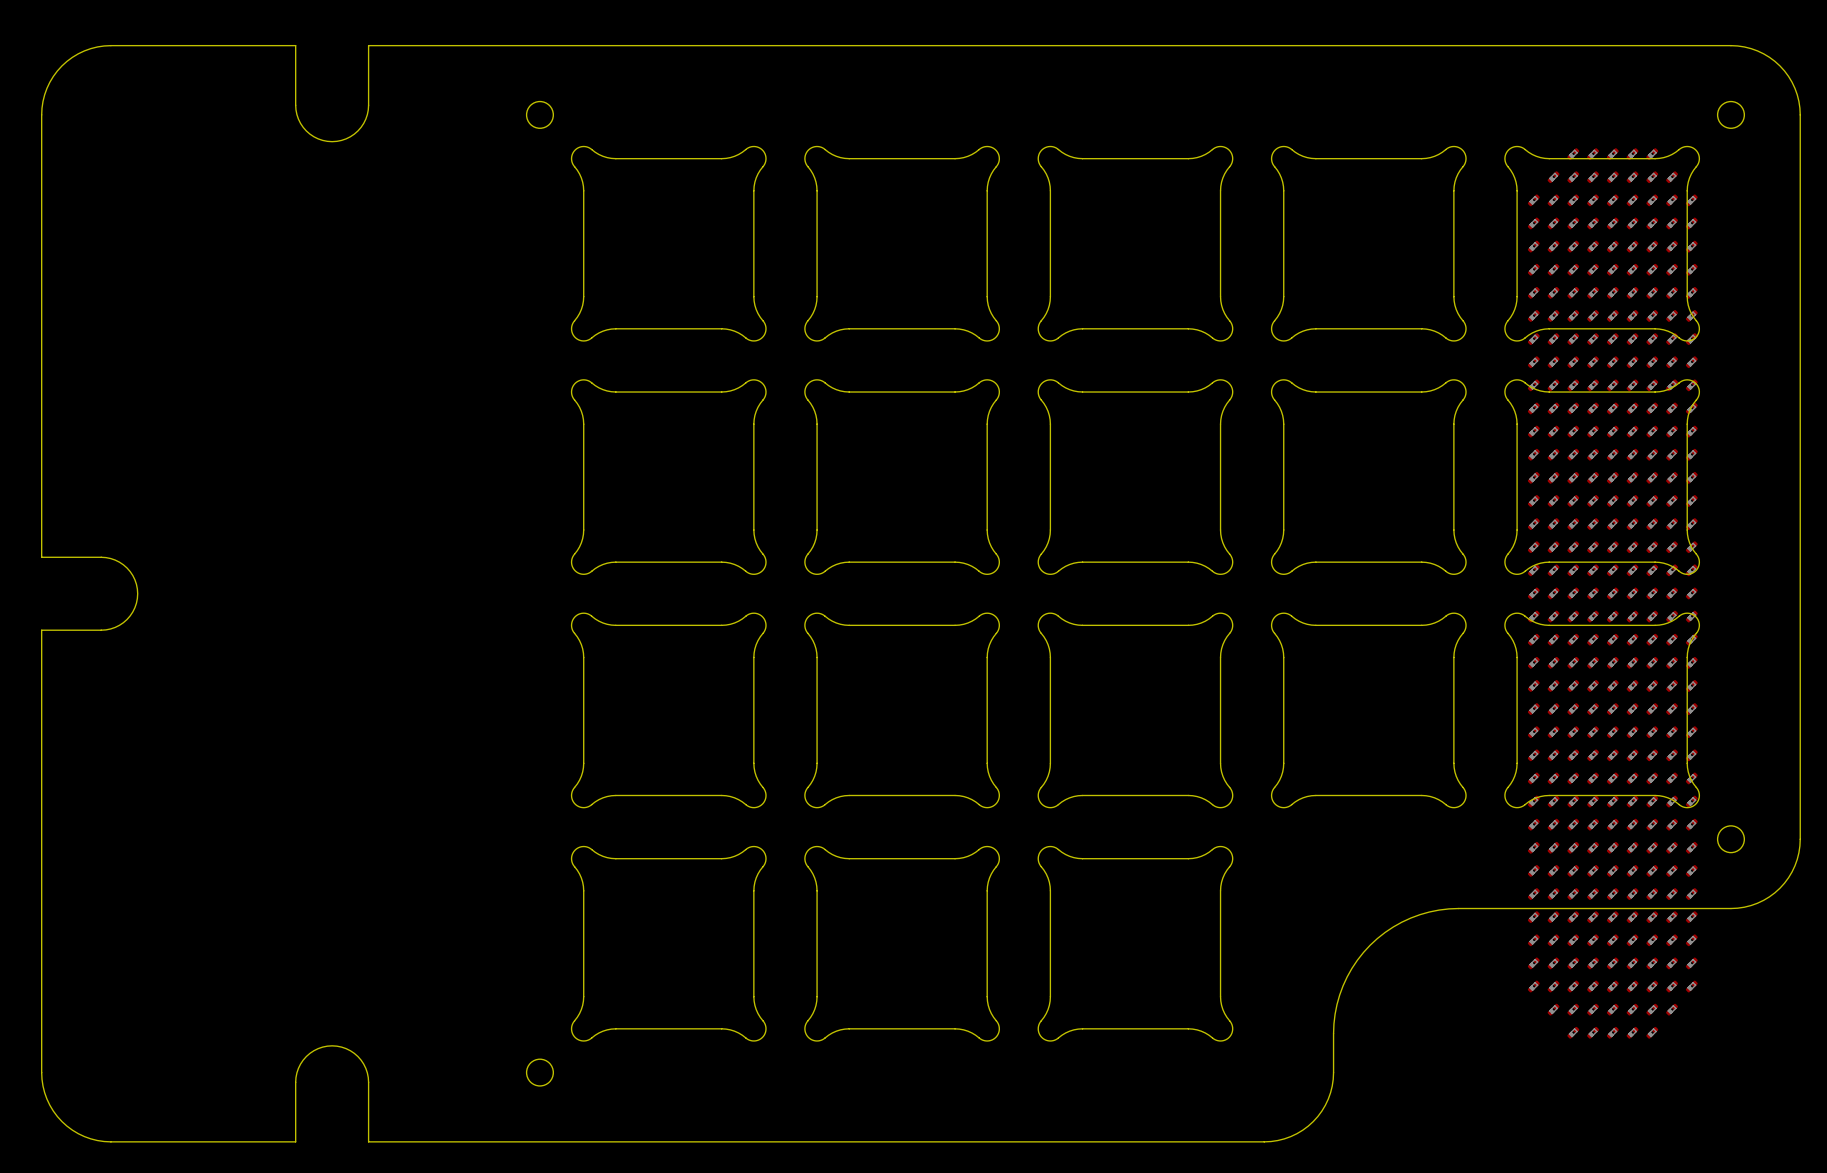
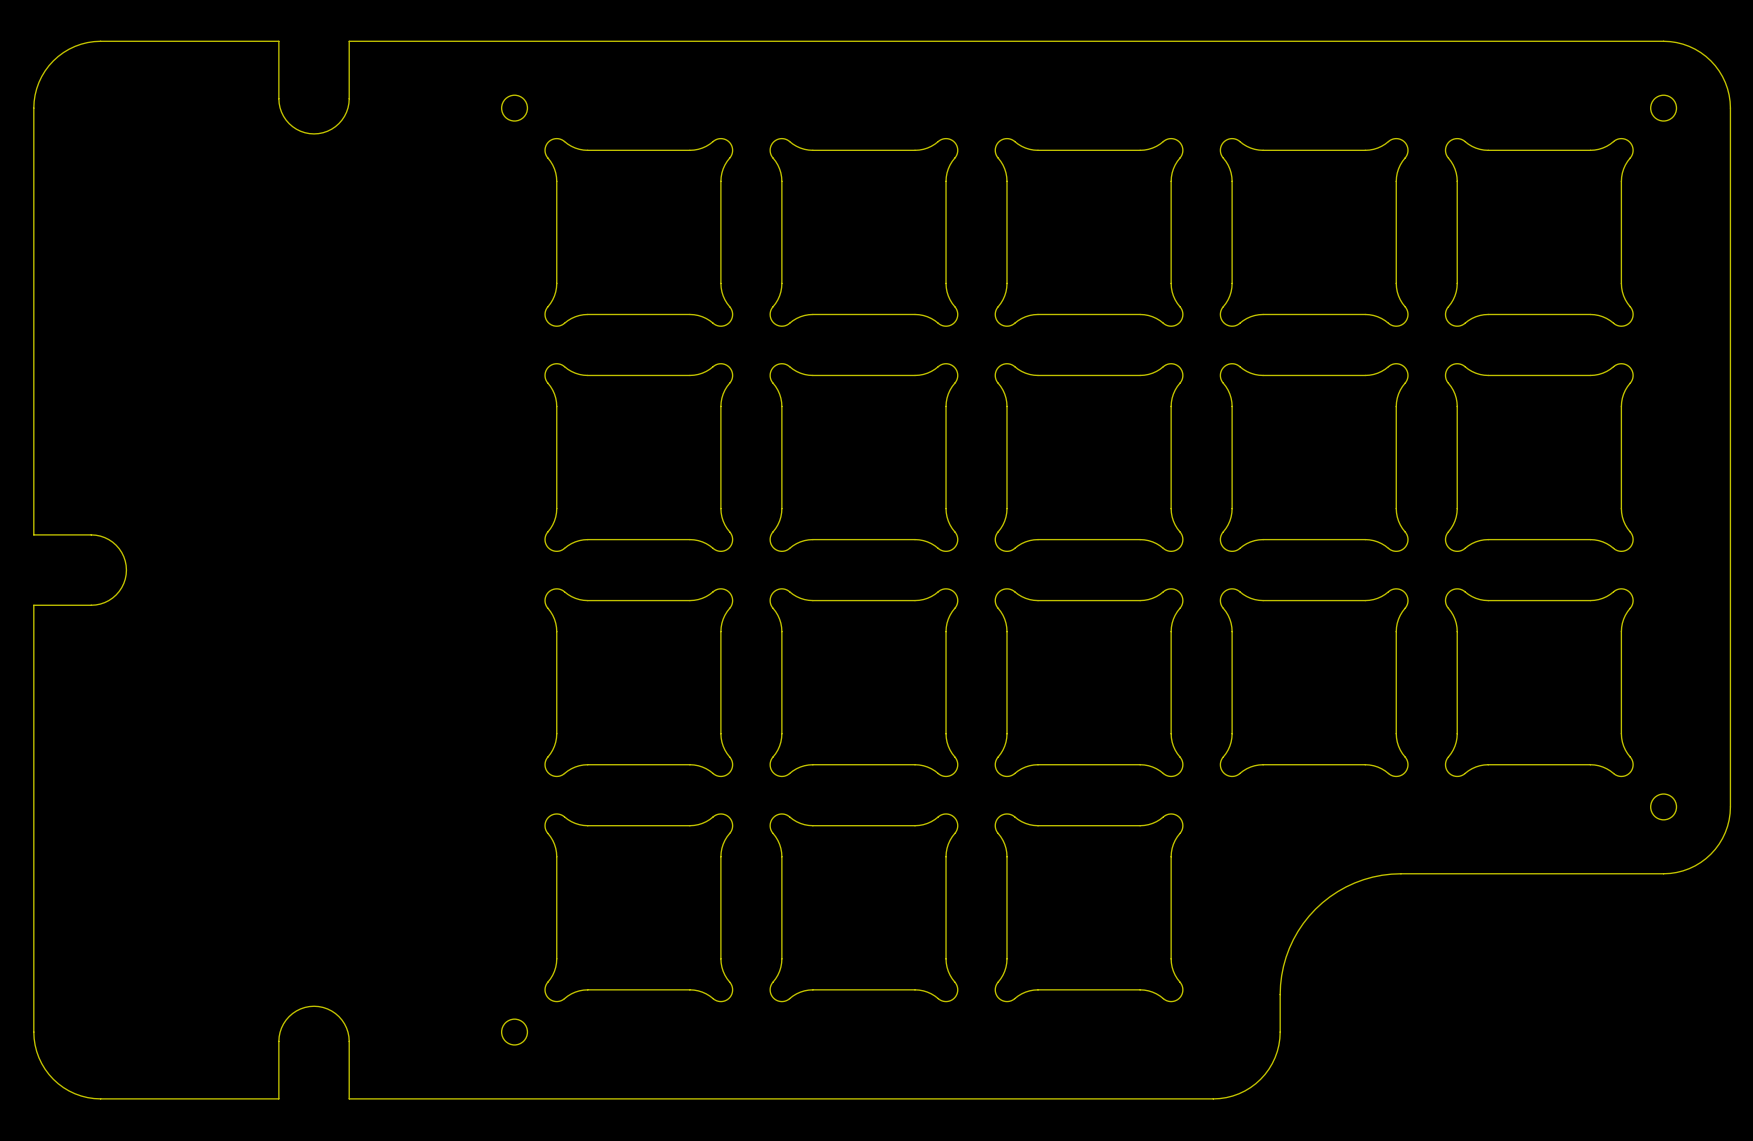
part: (1573, 154) -> none
part: (1593, 154) -> none
part: (1612, 154) -> none
part: (1632, 154) -> none
part: (1652, 154) -> none
part: (1553, 177) -> none
part: (1573, 177) -> none
part: (1593, 177) -> none
part: (1612, 177) -> none
part: (1632, 177) -> none
part: (1652, 177) -> none
part: (1672, 177) -> none
part: (1533, 200) -> none
part: (1553, 200) -> none
part: (1573, 200) -> none
part: (1593, 200) -> none
part: (1612, 200) -> none
part: (1632, 200) -> none
part: (1652, 200) -> none
part: (1672, 200) -> none
part: (1691, 200) -> none
part: (1533, 223) -> none
part: (1553, 223) -> none
part: (1573, 223) -> none
part: (1593, 223) -> none
part: (1612, 223) -> none
part: (1632, 223) -> none
part: (1652, 223) -> none
part: (1672, 223) -> none
part: (1691, 223) -> none
part: (1533, 246) -> none
part: (1553, 246) -> none
part: (1573, 246) -> none
part: (1593, 246) -> none
part: (1612, 246) -> none
part: (1632, 246) -> none
part: (1652, 246) -> none
part: (1672, 246) -> none
part: (1691, 246) -> none
part: (1533, 269) -> none
part: (1553, 269) -> none
part: (1573, 269) -> none
part: (1593, 269) -> none
part: (1612, 269) -> none
part: (1632, 269) -> none
part: (1652, 269) -> none
part: (1672, 269) -> none
part: (1691, 269) -> none
part: (1533, 292) -> none
part: (1553, 292) -> none
part: (1573, 292) -> none
part: (1593, 292) -> none
part: (1612, 292) -> none
part: (1632, 292) -> none
part: (1652, 292) -> none
part: (1672, 292) -> none
part: (1691, 292) -> none
part: (1533, 315) -> none
part: (1553, 315) -> none
part: (1573, 315) -> none
part: (1593, 315) -> none
part: (1612, 315) -> none
part: (1632, 315) -> none
part: (1652, 315) -> none
part: (1672, 315) -> none
part: (1691, 315) -> none
part: (1533, 339) -> none
part: (1553, 339) -> none
part: (1573, 339) -> none
part: (1593, 339) -> none
part: (1612, 339) -> none
part: (1632, 339) -> none
part: (1652, 339) -> none
part: (1672, 339) -> none
part: (1691, 339) -> none
part: (1533, 362) -> none
part: (1553, 362) -> none
part: (1573, 362) -> none
part: (1593, 362) -> none
part: (1612, 362) -> none
part: (1632, 362) -> none
part: (1652, 362) -> none
part: (1672, 362) -> none
part: (1691, 362) -> none
part: (1533, 385) -> none
part: (1553, 385) -> none
part: (1573, 385) -> none
part: (1593, 385) -> none
part: (1612, 385) -> none
part: (1632, 385) -> none
part: (1652, 385) -> none
part: (1672, 385) -> none
part: (1691, 385) -> none
part: (1533, 408) -> none
part: (1553, 408) -> none
part: (1573, 408) -> none
part: (1593, 408) -> none
part: (1612, 408) -> none
part: (1632, 408) -> none
part: (1652, 408) -> none
part: (1672, 408) -> none
part: (1691, 408) -> none
part: (1533, 431) -> none
part: (1553, 431) -> none
part: (1573, 431) -> none
part: (1593, 431) -> none
part: (1612, 431) -> none
part: (1632, 431) -> none
part: (1652, 431) -> none
part: (1672, 431) -> none
part: (1691, 431) -> none
part: (1533, 454) -> none
part: (1553, 454) -> none
part: (1573, 454) -> none
part: (1593, 454) -> none
part: (1612, 454) -> none
part: (1632, 454) -> none
part: (1652, 454) -> none
part: (1672, 454) -> none
part: (1691, 454) -> none
part: (1533, 477) -> none
part: (1553, 477) -> none
part: (1573, 477) -> none
part: (1593, 477) -> none
part: (1612, 477) -> none
part: (1632, 477) -> none
part: (1652, 477) -> none
part: (1672, 477) -> none
part: (1691, 477) -> none
part: (1533, 500) -> none
part: (1553, 500) -> none
part: (1573, 500) -> none
part: (1593, 500) -> none
part: (1612, 500) -> none
part: (1632, 500) -> none
part: (1652, 500) -> none
part: (1672, 500) -> none
part: (1691, 500) -> none
part: (1533, 524) -> none
part: (1553, 524) -> none
part: (1573, 524) -> none
part: (1593, 524) -> none
part: (1612, 524) -> none
part: (1632, 524) -> none
part: (1652, 524) -> none
part: (1672, 524) -> none
part: (1691, 524) -> none
part: (1533, 547) -> none
part: (1553, 547) -> none
part: (1573, 547) -> none
part: (1593, 547) -> none
part: (1612, 547) -> none
part: (1632, 547) -> none
part: (1652, 547) -> none
part: (1672, 547) -> none
part: (1691, 547) -> none
part: (1533, 570) -> none
part: (1553, 570) -> none
part: (1573, 570) -> none
part: (1593, 570) -> none
part: (1612, 570) -> none
part: (1632, 570) -> none
part: (1652, 570) -> none
part: (1672, 570) -> none
part: (1691, 570) -> none
part: (1533, 593) -> none
part: (1553, 593) -> none
part: (1573, 593) -> none
part: (1593, 593) -> none
part: (1612, 593) -> none
part: (1632, 593) -> none
part: (1652, 593) -> none
part: (1672, 593) -> none
part: (1691, 593) -> none
part: (1533, 616) -> none
part: (1553, 616) -> none
part: (1573, 616) -> none
part: (1593, 616) -> none
part: (1612, 616) -> none
part: (1632, 616) -> none
part: (1652, 616) -> none
part: (1672, 616) -> none
part: (1691, 616) -> none
part: (1533, 639) -> none
part: (1553, 639) -> none
part: (1573, 639) -> none
part: (1593, 639) -> none
part: (1612, 639) -> none
part: (1632, 639) -> none
part: (1652, 639) -> none
part: (1672, 639) -> none
part: (1691, 639) -> none
part: (1533, 662) -> none
part: (1553, 662) -> none
part: (1573, 662) -> none
part: (1593, 662) -> none
part: (1612, 662) -> none
part: (1632, 662) -> none
part: (1652, 662) -> none
part: (1672, 662) -> none
part: (1691, 662) -> none
part: (1533, 685) -> none
part: (1553, 685) -> none
part: (1573, 685) -> none
part: (1593, 685) -> none
part: (1612, 685) -> none
part: (1632, 685) -> none
part: (1652, 685) -> none
part: (1672, 685) -> none
part: (1691, 685) -> none
part: (1533, 709) -> none
part: (1553, 709) -> none
part: (1573, 709) -> none
part: (1593, 709) -> none
part: (1612, 709) -> none
part: (1632, 709) -> none
part: (1652, 709) -> none
part: (1672, 709) -> none
part: (1691, 709) -> none
part: (1533, 732) -> none
part: (1553, 732) -> none
part: (1573, 732) -> none
part: (1593, 732) -> none
part: (1612, 732) -> none
part: (1632, 732) -> none
part: (1652, 732) -> none
part: (1672, 732) -> none
part: (1691, 732) -> none
part: (1533, 755) -> none
part: (1553, 755) -> none
part: (1573, 755) -> none
part: (1593, 755) -> none
part: (1612, 755) -> none
part: (1632, 755) -> none
part: (1652, 755) -> none
part: (1672, 755) -> none
part: (1691, 755) -> none
part: (1533, 778) -> none
part: (1553, 778) -> none
part: (1573, 778) -> none
part: (1593, 778) -> none
part: (1612, 778) -> none
part: (1632, 778) -> none
part: (1652, 778) -> none
part: (1672, 778) -> none
part: (1691, 778) -> none
part: (1533, 801) -> none
part: (1553, 801) -> none
part: (1573, 801) -> none
part: (1593, 801) -> none
part: (1612, 801) -> none
part: (1632, 801) -> none
part: (1652, 801) -> none
part: (1672, 801) -> none
part: (1691, 801) -> none
part: (1533, 824) -> none
part: (1553, 824) -> none
part: (1573, 824) -> none
part: (1593, 824) -> none
part: (1612, 824) -> none
part: (1632, 824) -> none
part: (1652, 824) -> none
part: (1672, 824) -> none
part: (1691, 824) -> none
part: (1533, 847) -> none
part: (1553, 847) -> none
part: (1573, 847) -> none
part: (1593, 847) -> none
part: (1612, 847) -> none
part: (1632, 847) -> none
part: (1652, 847) -> none
part: (1672, 847) -> none
part: (1691, 847) -> none
part: (1533, 870) -> none
part: (1553, 870) -> none
part: (1573, 870) -> none
part: (1593, 870) -> none
part: (1612, 870) -> none
part: (1632, 870) -> none
part: (1652, 870) -> none
part: (1672, 870) -> none
part: (1691, 870) -> none
part: (1533, 894) -> none
part: (1553, 894) -> none
part: (1573, 894) -> none
part: (1593, 894) -> none
part: (1612, 894) -> none
part: (1632, 894) -> none
part: (1652, 894) -> none
part: (1672, 894) -> none
part: (1691, 894) -> none
part: (1533, 917) -> none
part: (1553, 917) -> none
part: (1573, 917) -> none
part: (1593, 917) -> none
part: (1612, 917) -> none
part: (1632, 917) -> none
part: (1652, 917) -> none
part: (1672, 917) -> none
part: (1691, 917) -> none
part: (1533, 940) -> none
part: (1553, 940) -> none
part: (1573, 940) -> none
part: (1593, 940) -> none
part: (1612, 940) -> none
part: (1632, 940) -> none
part: (1652, 940) -> none
part: (1672, 940) -> none
part: (1691, 940) -> none
part: (1533, 963) -> none
part: (1553, 963) -> none
part: (1573, 963) -> none
part: (1593, 963) -> none
part: (1612, 963) -> none
part: (1632, 963) -> none
part: (1652, 963) -> none
part: (1672, 963) -> none
part: (1691, 963) -> none
part: (1533, 986) -> none
part: (1553, 986) -> none
part: (1573, 986) -> none
part: (1593, 986) -> none
part: (1612, 986) -> none
part: (1632, 986) -> none
part: (1652, 986) -> none
part: (1672, 986) -> none
part: (1691, 986) -> none
part: (1553, 1009) -> none
part: (1573, 1009) -> none
part: (1593, 1009) -> none
part: (1612, 1009) -> none
part: (1632, 1009) -> none
part: (1652, 1009) -> none
part: (1672, 1009) -> none
part: (1573, 1032) -> none
part: (1593, 1032) -> none
part: (1612, 1032) -> none
part: (1632, 1032) -> none
part: (1652, 1032) -> none

